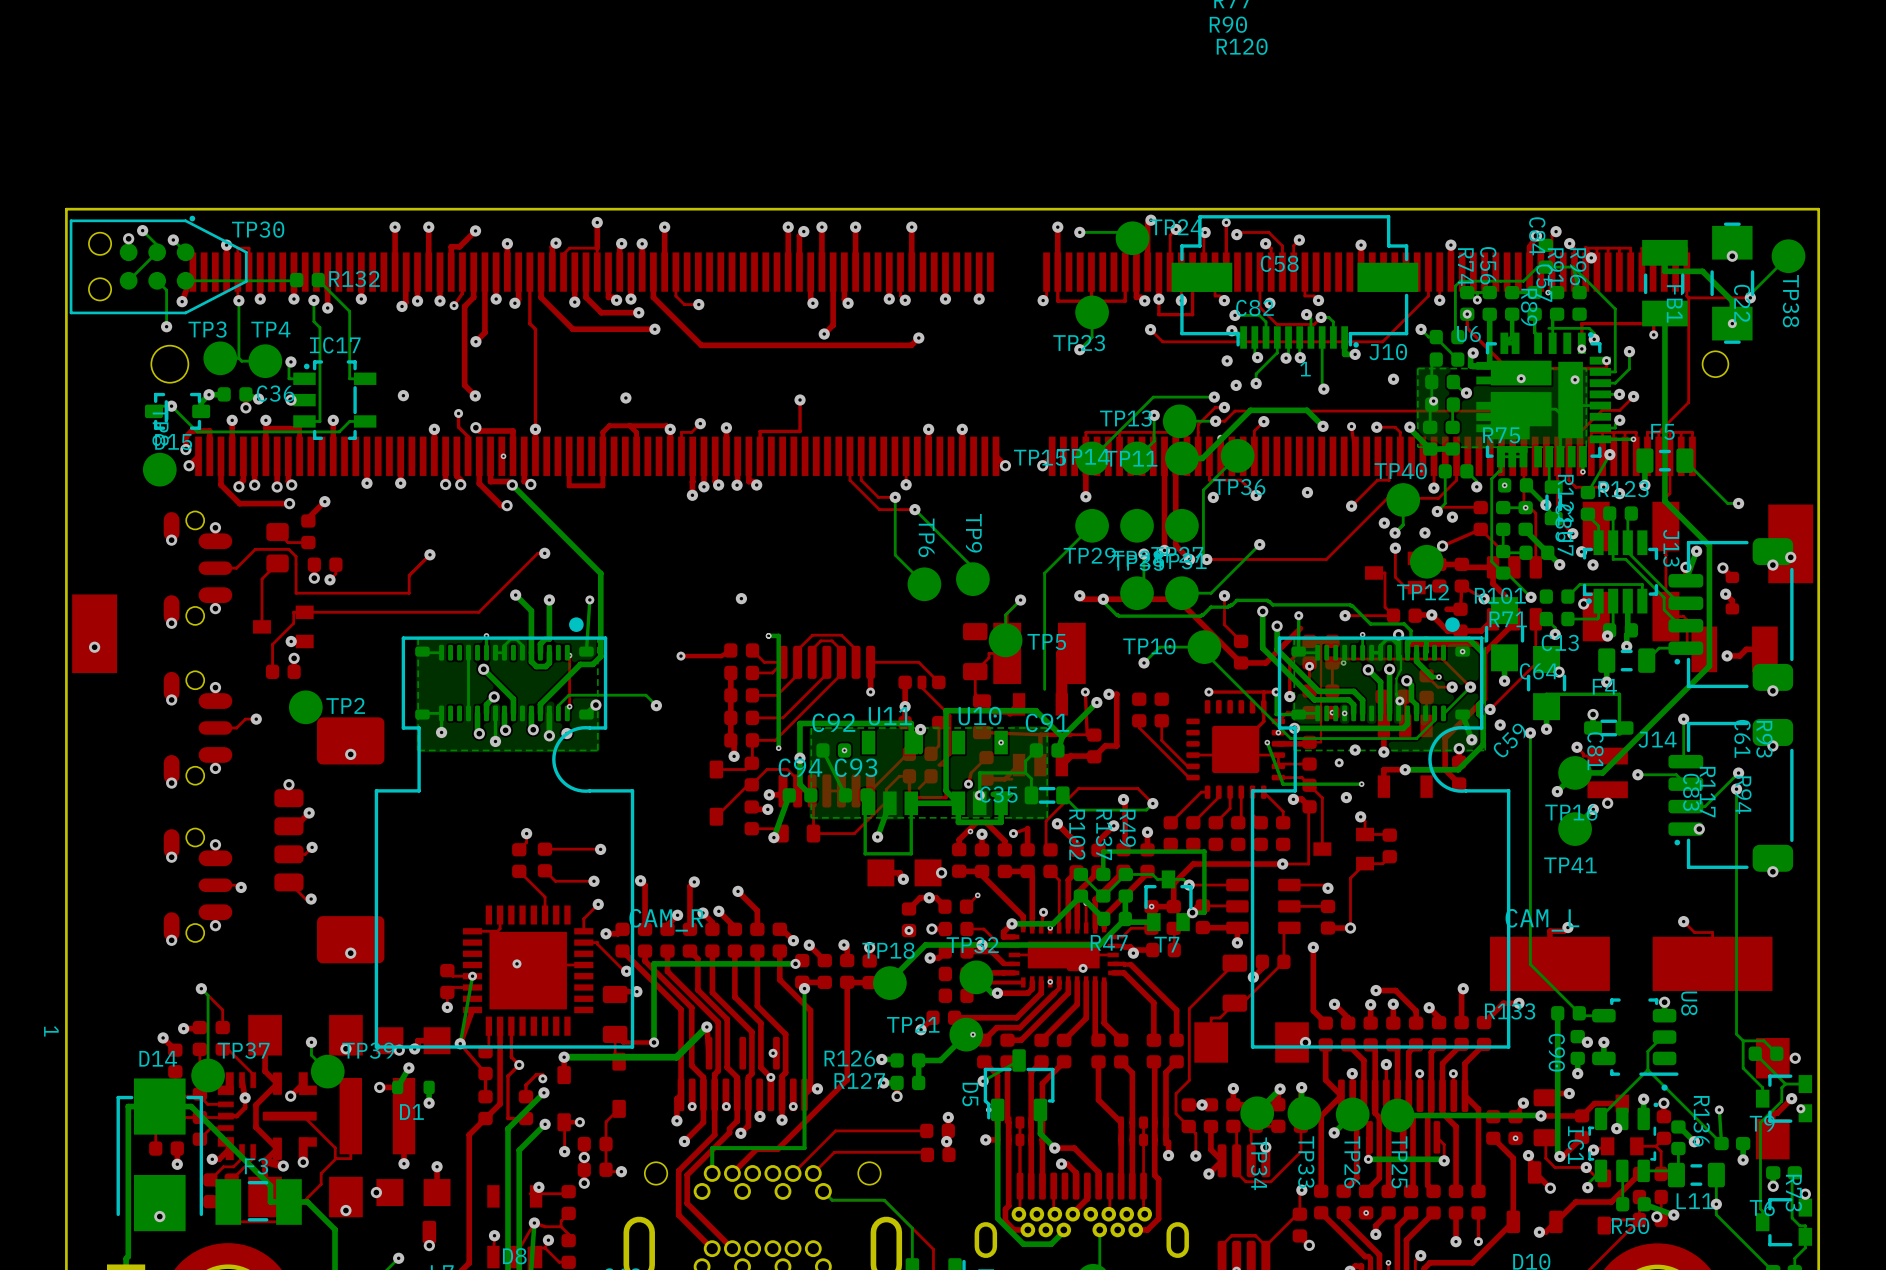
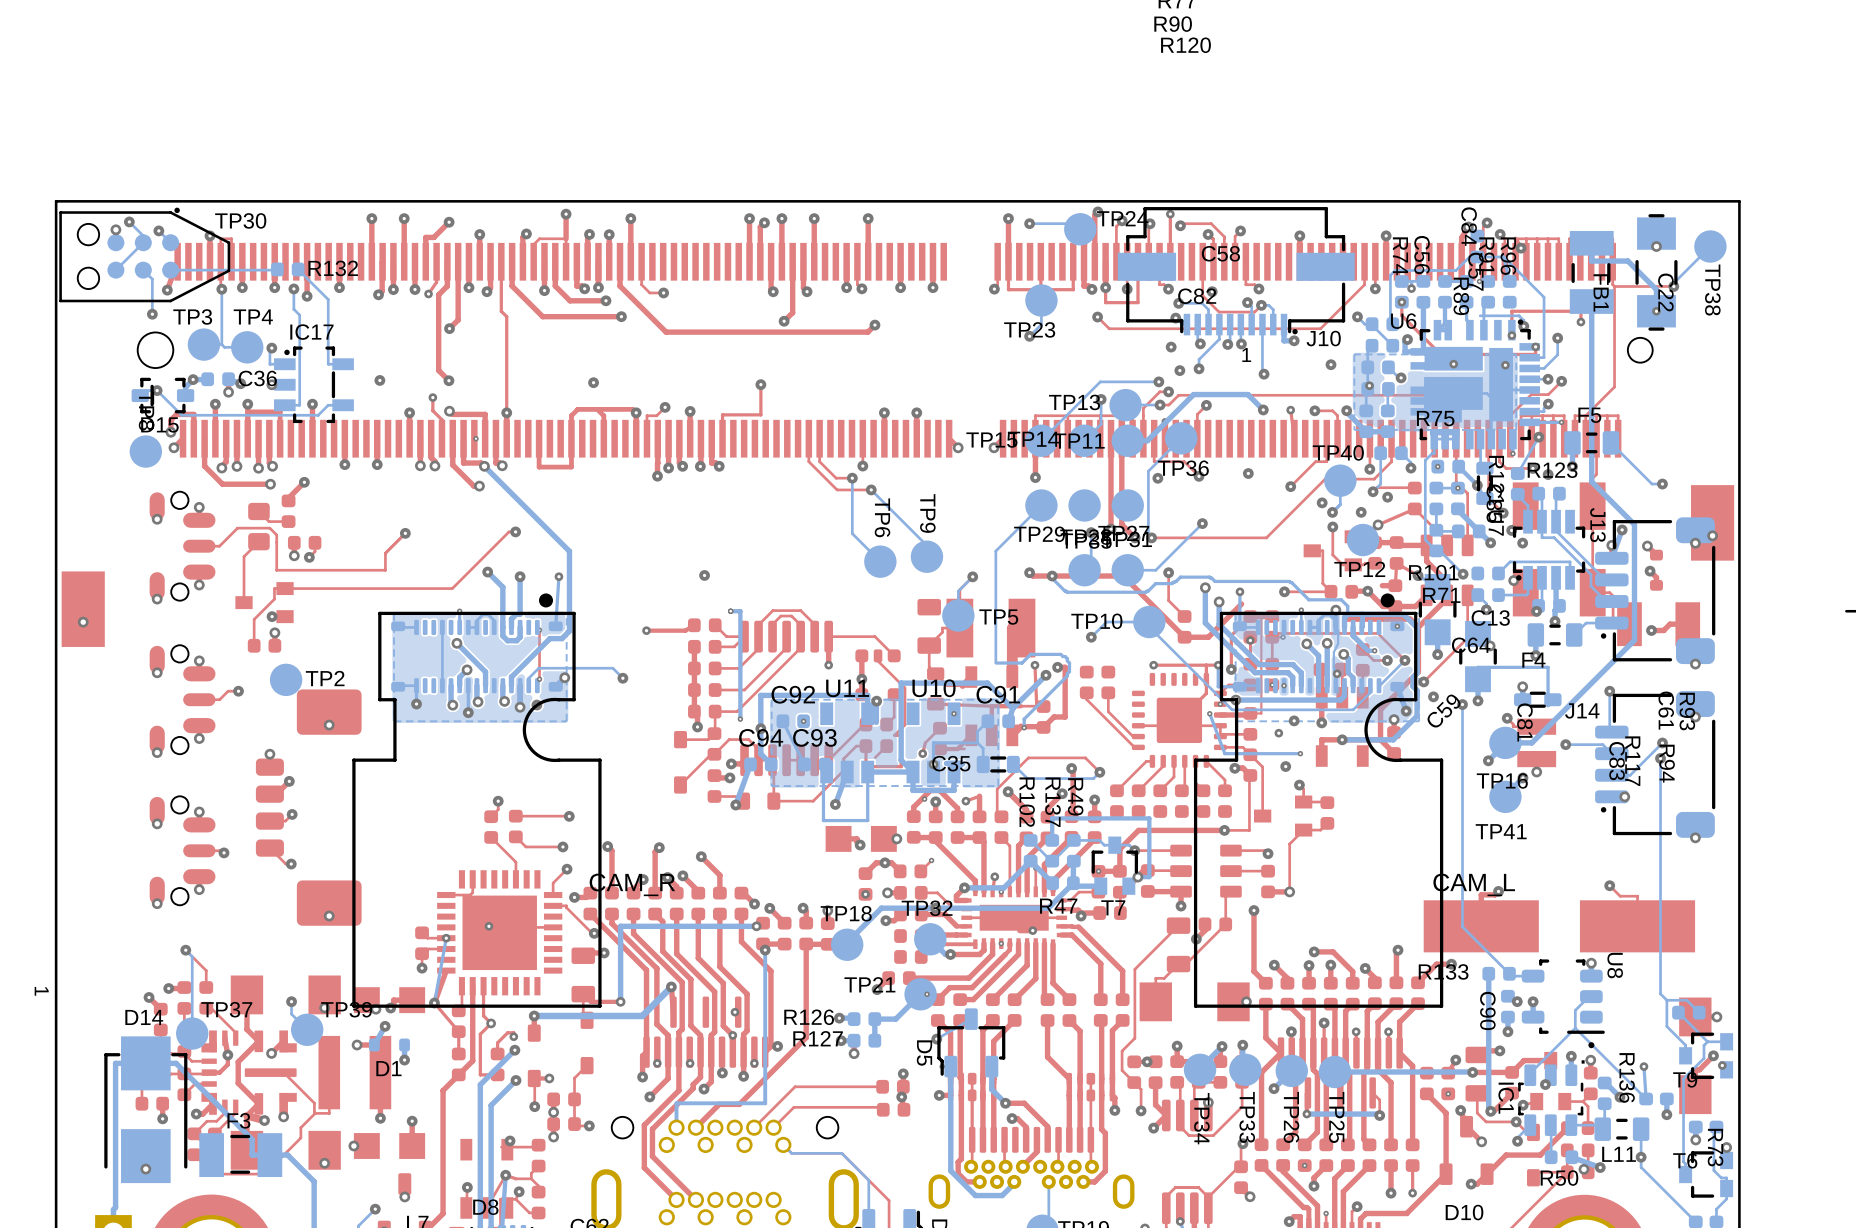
bottom track: none -> (996, 663) (1022, 663) (1030, 654) (1060, 654) (1067, 658) (1069, 663) (1067, 675) (1024, 719) (1024, 727)
via: none -> (1024, 727)

